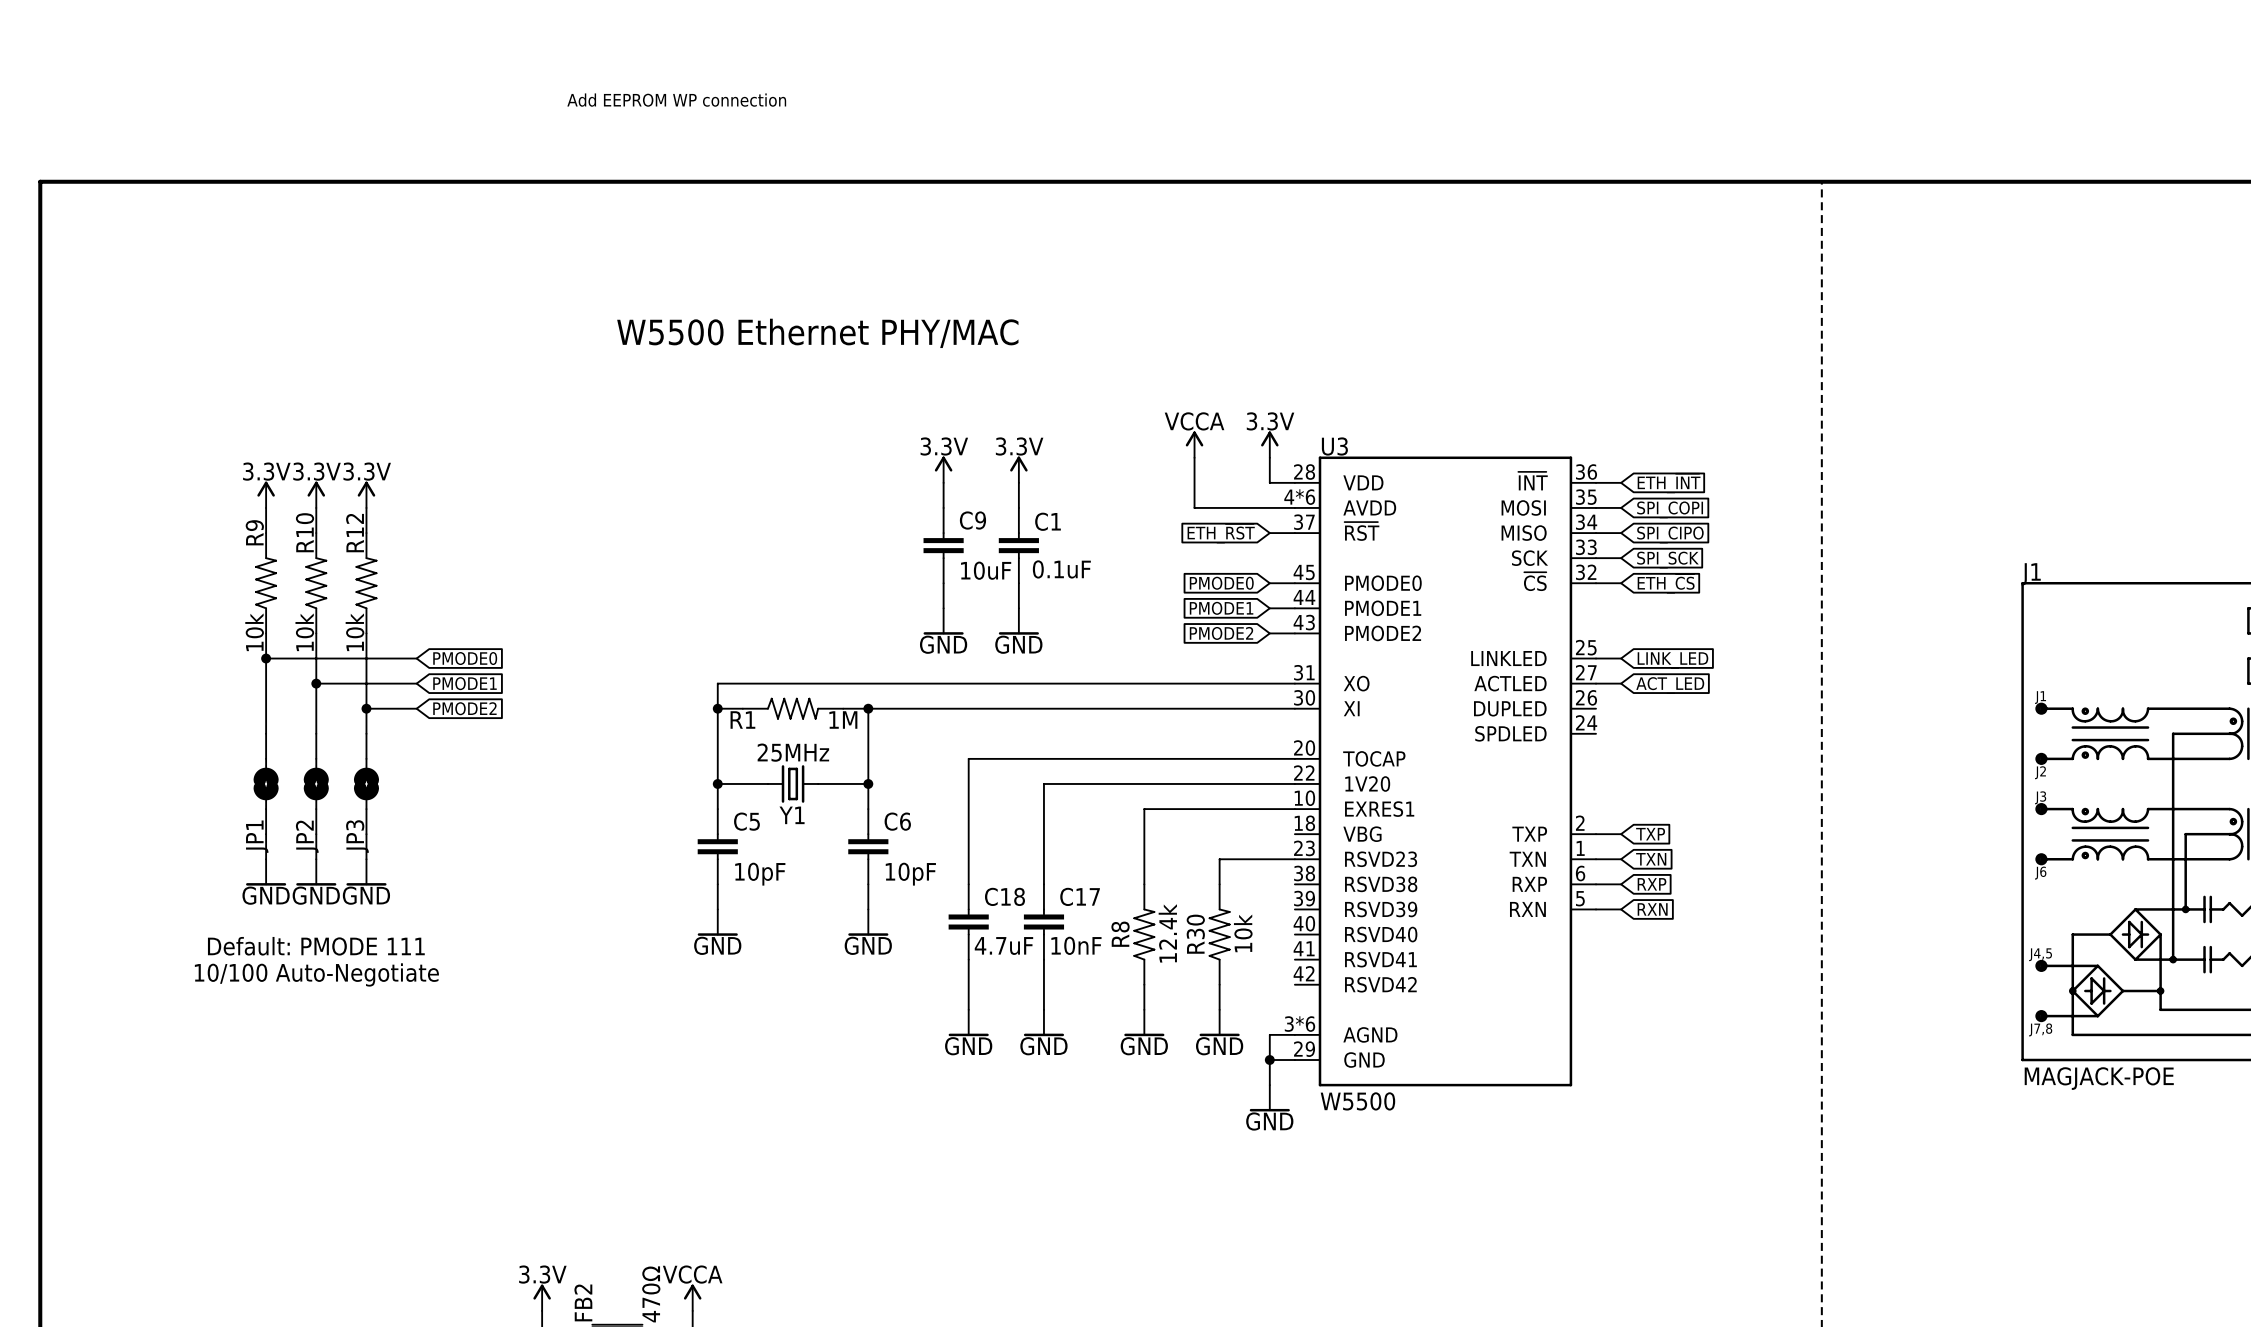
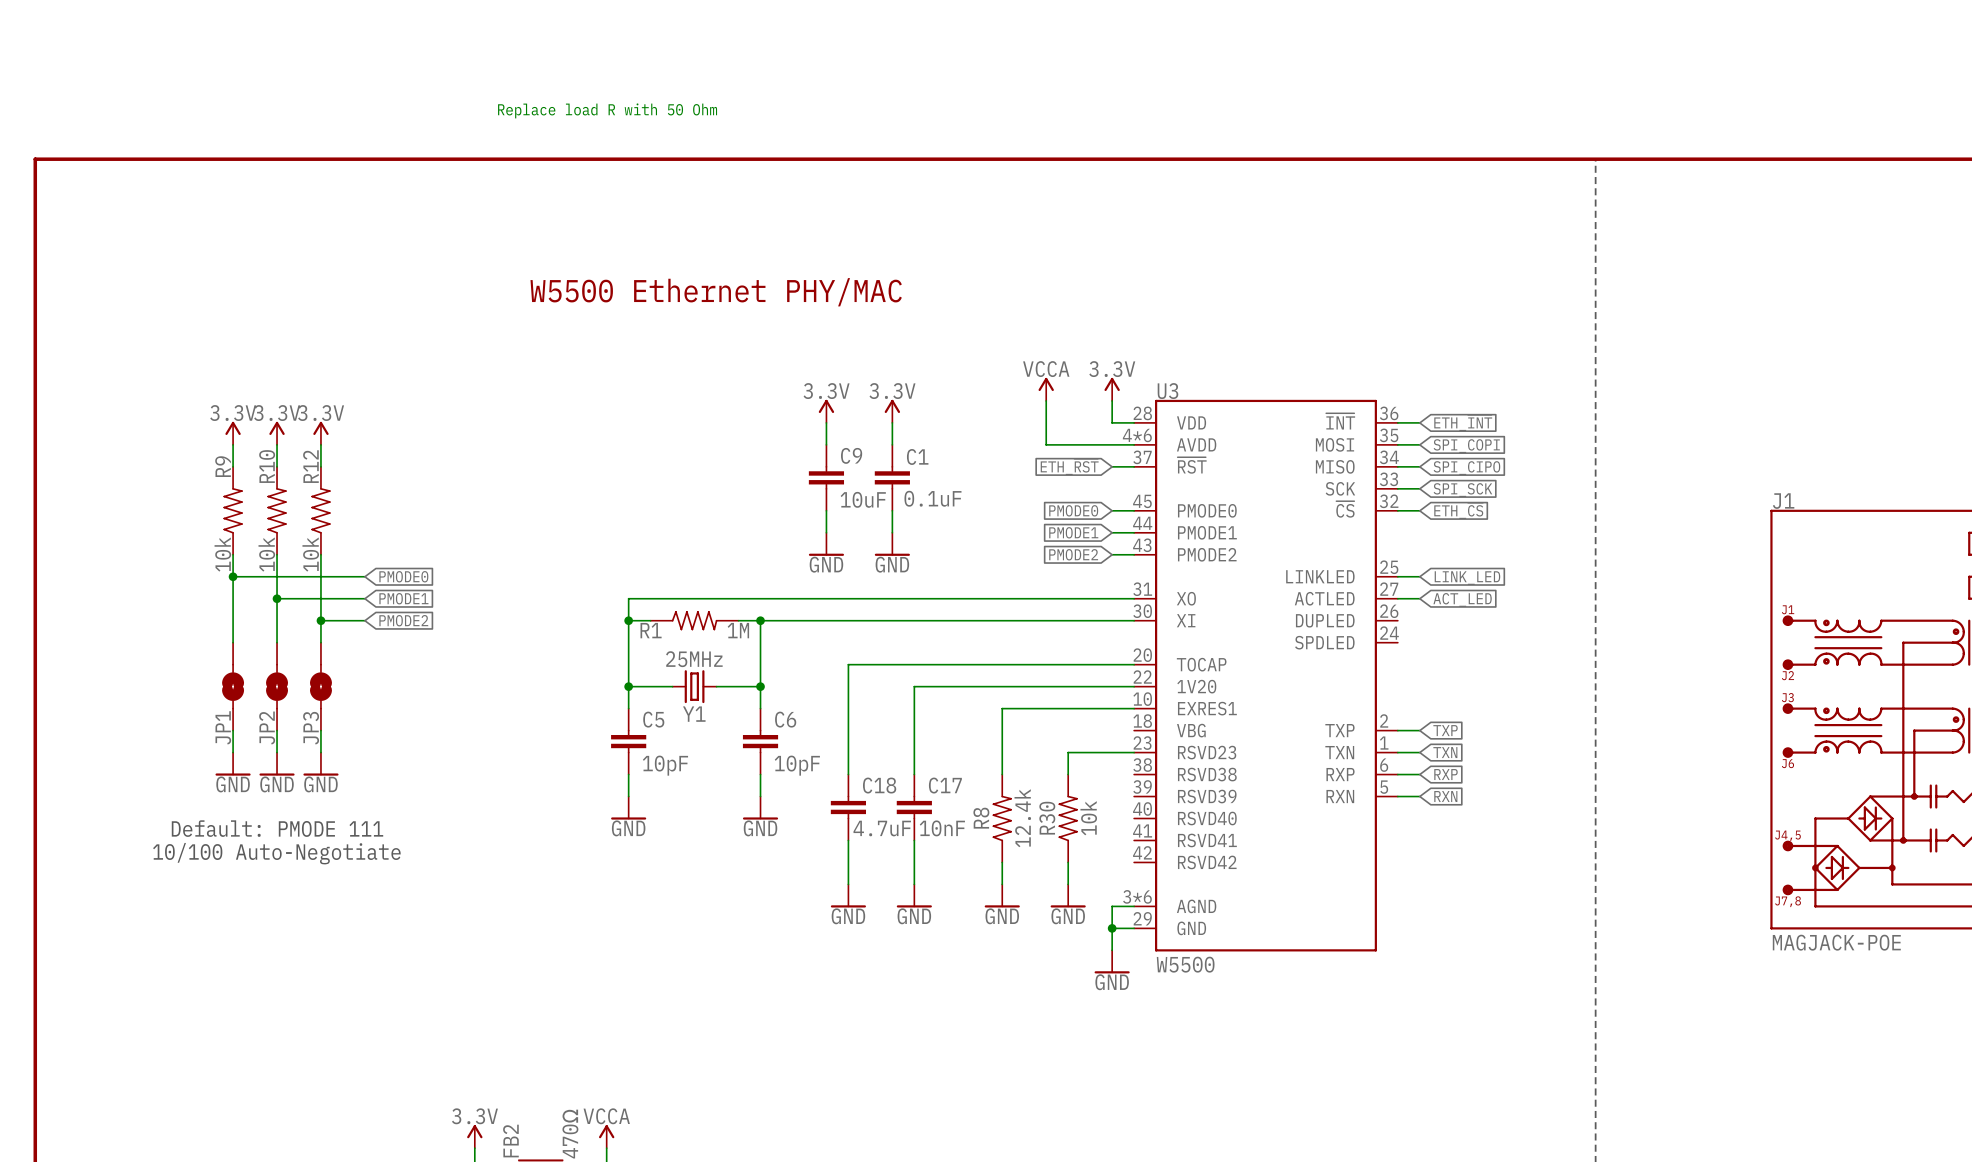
text: Add EEPROM WP connection (676, 100) -> none
text: none -> Replace load R with 50 Ohm (607, 110)

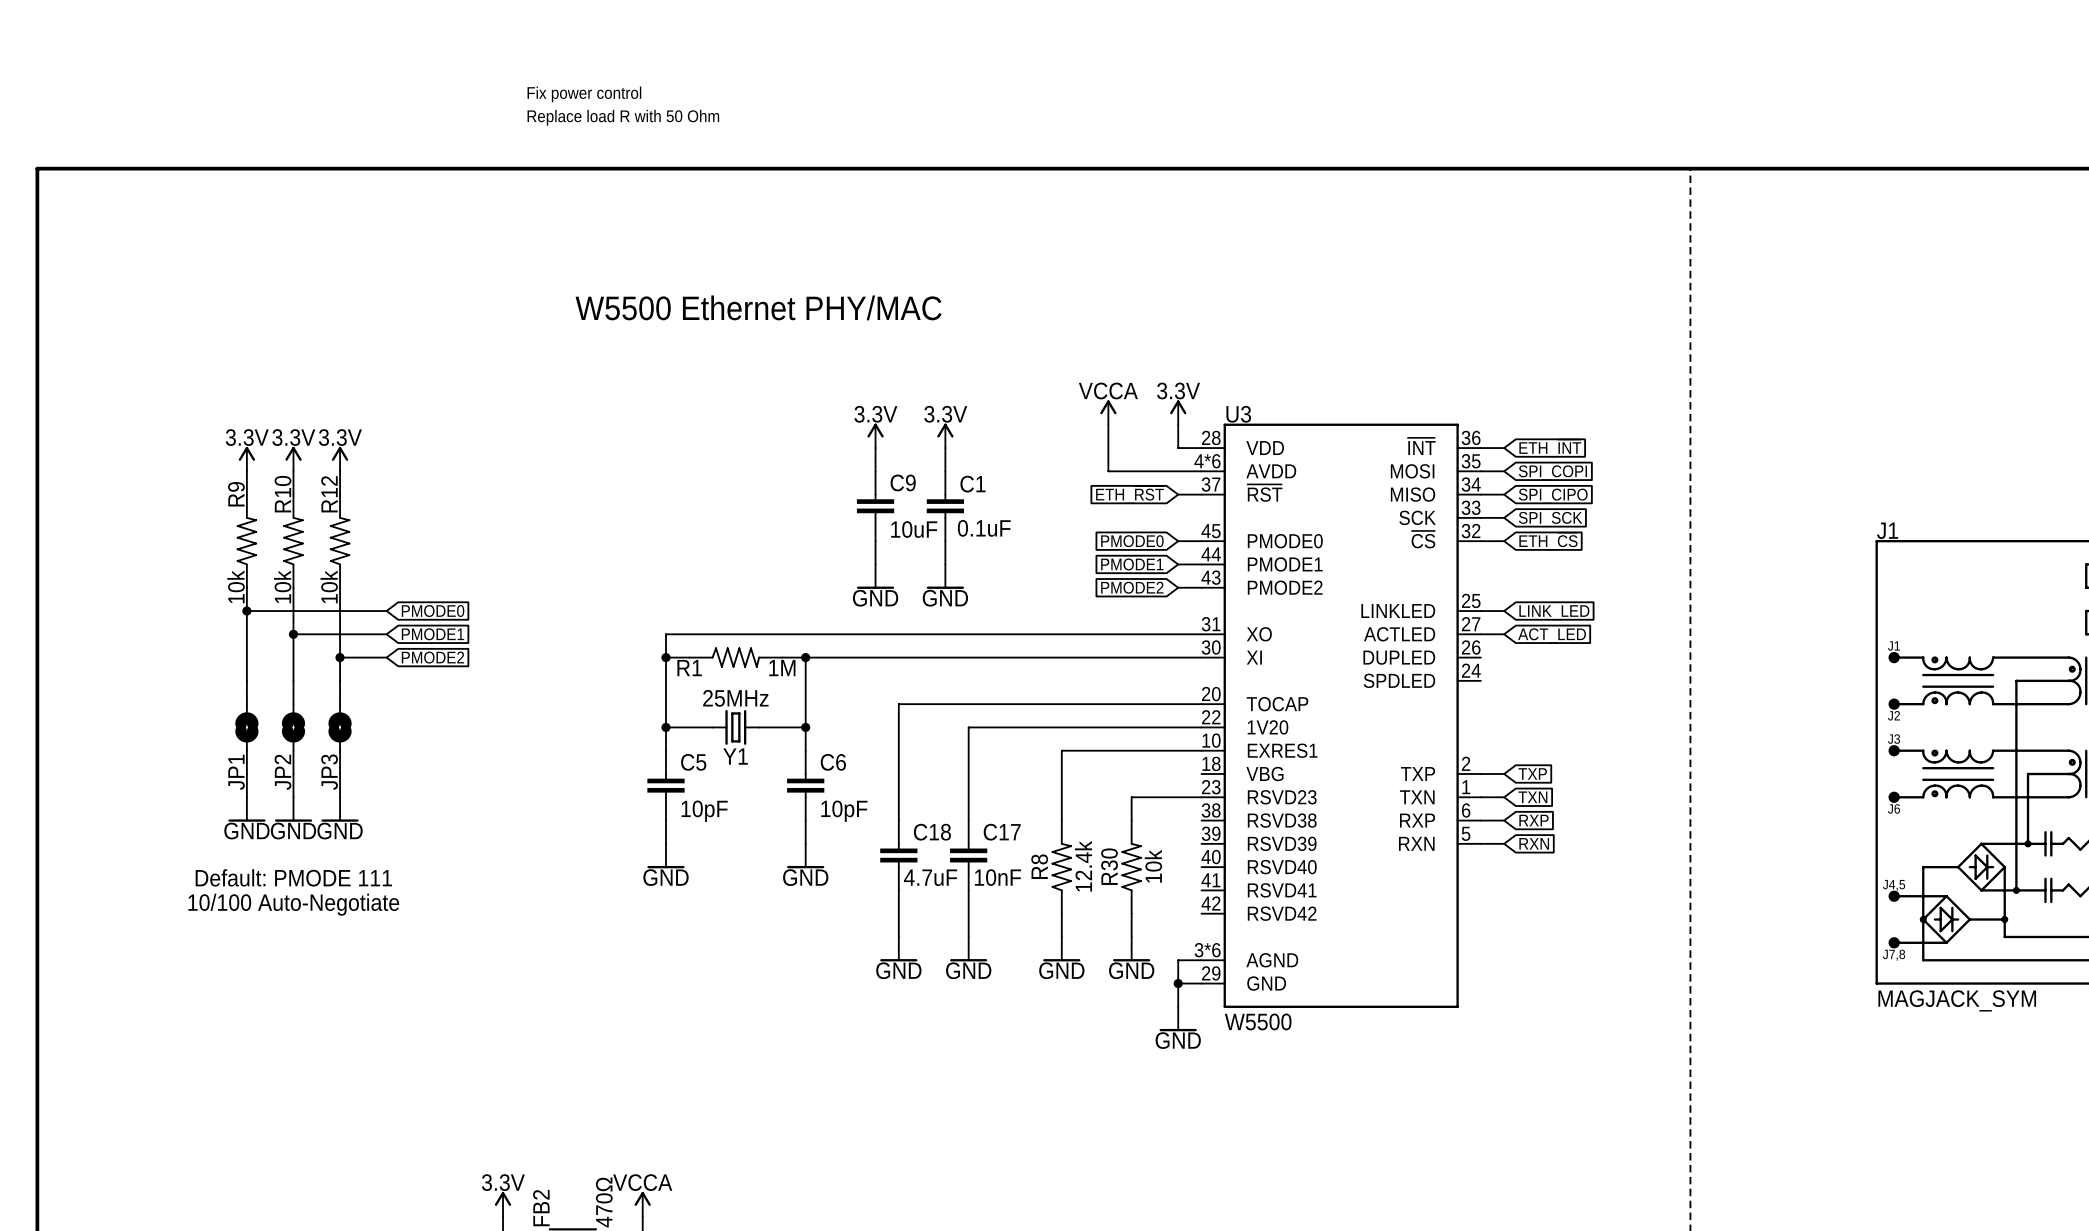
text: none -> Fix power control (584, 94)
J1 value: MAGJACK-POE (1836, 942) -> MAGJACK_SYM (1957, 1000)

